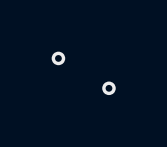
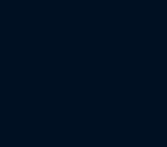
via: (58, 58) -> none
via: (108, 88) -> none

